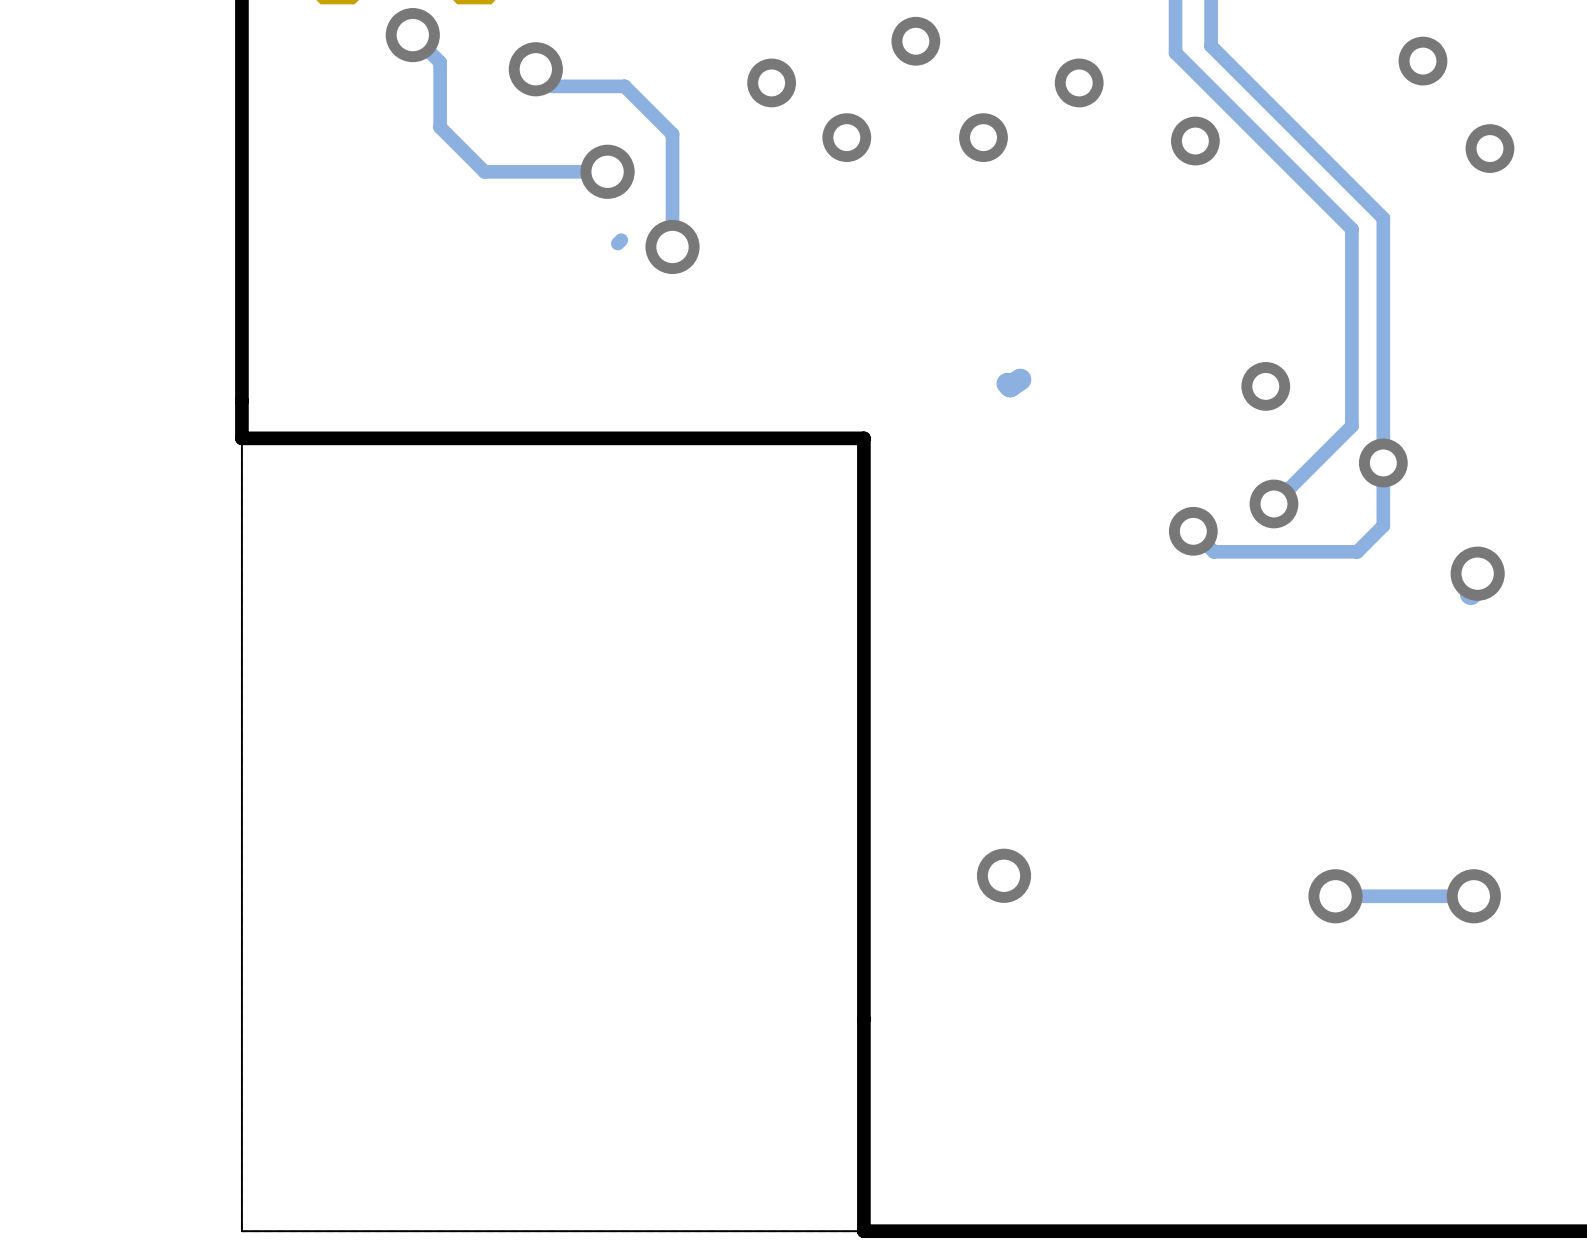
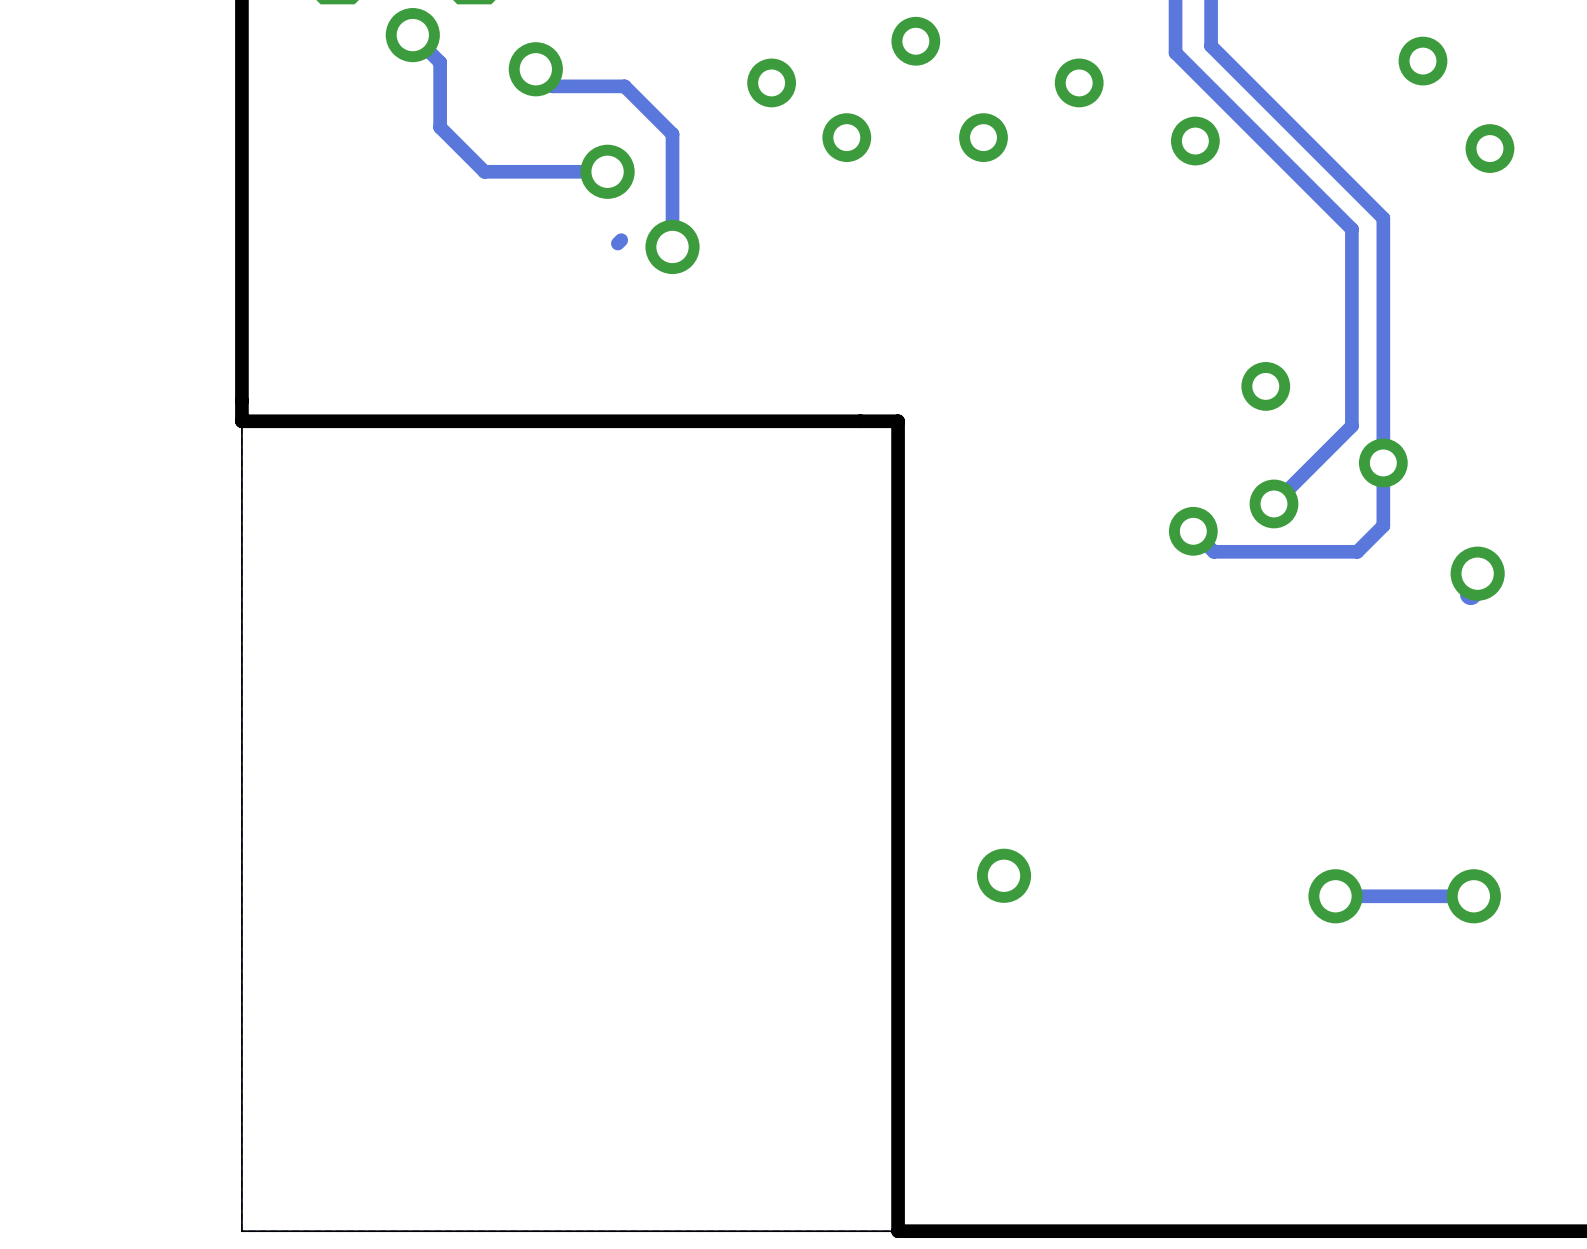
track: (1020, 379) (1010, 386) (1007, 383) -> none
board edge: (241, 421) (241, 438) (863, 438) (863, 1231) (898, 1231) -> (241, 421) (898, 421) (898, 1231)

